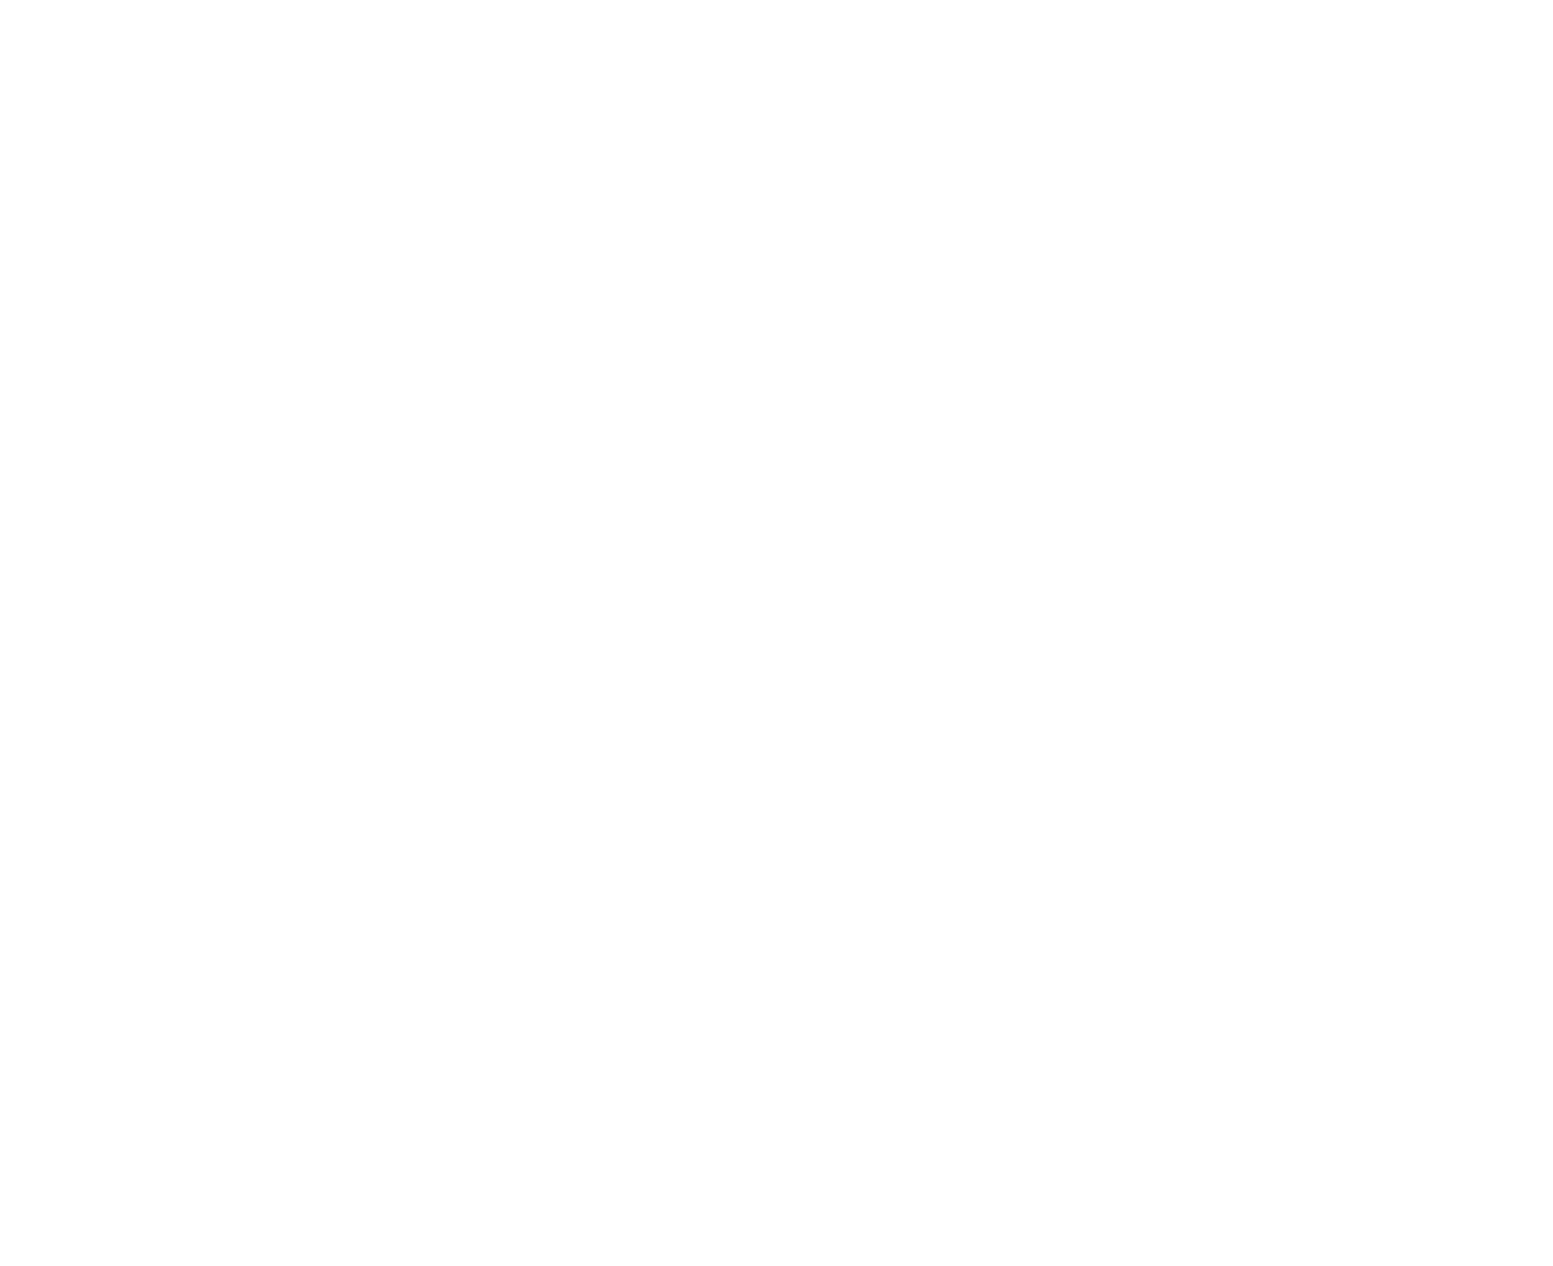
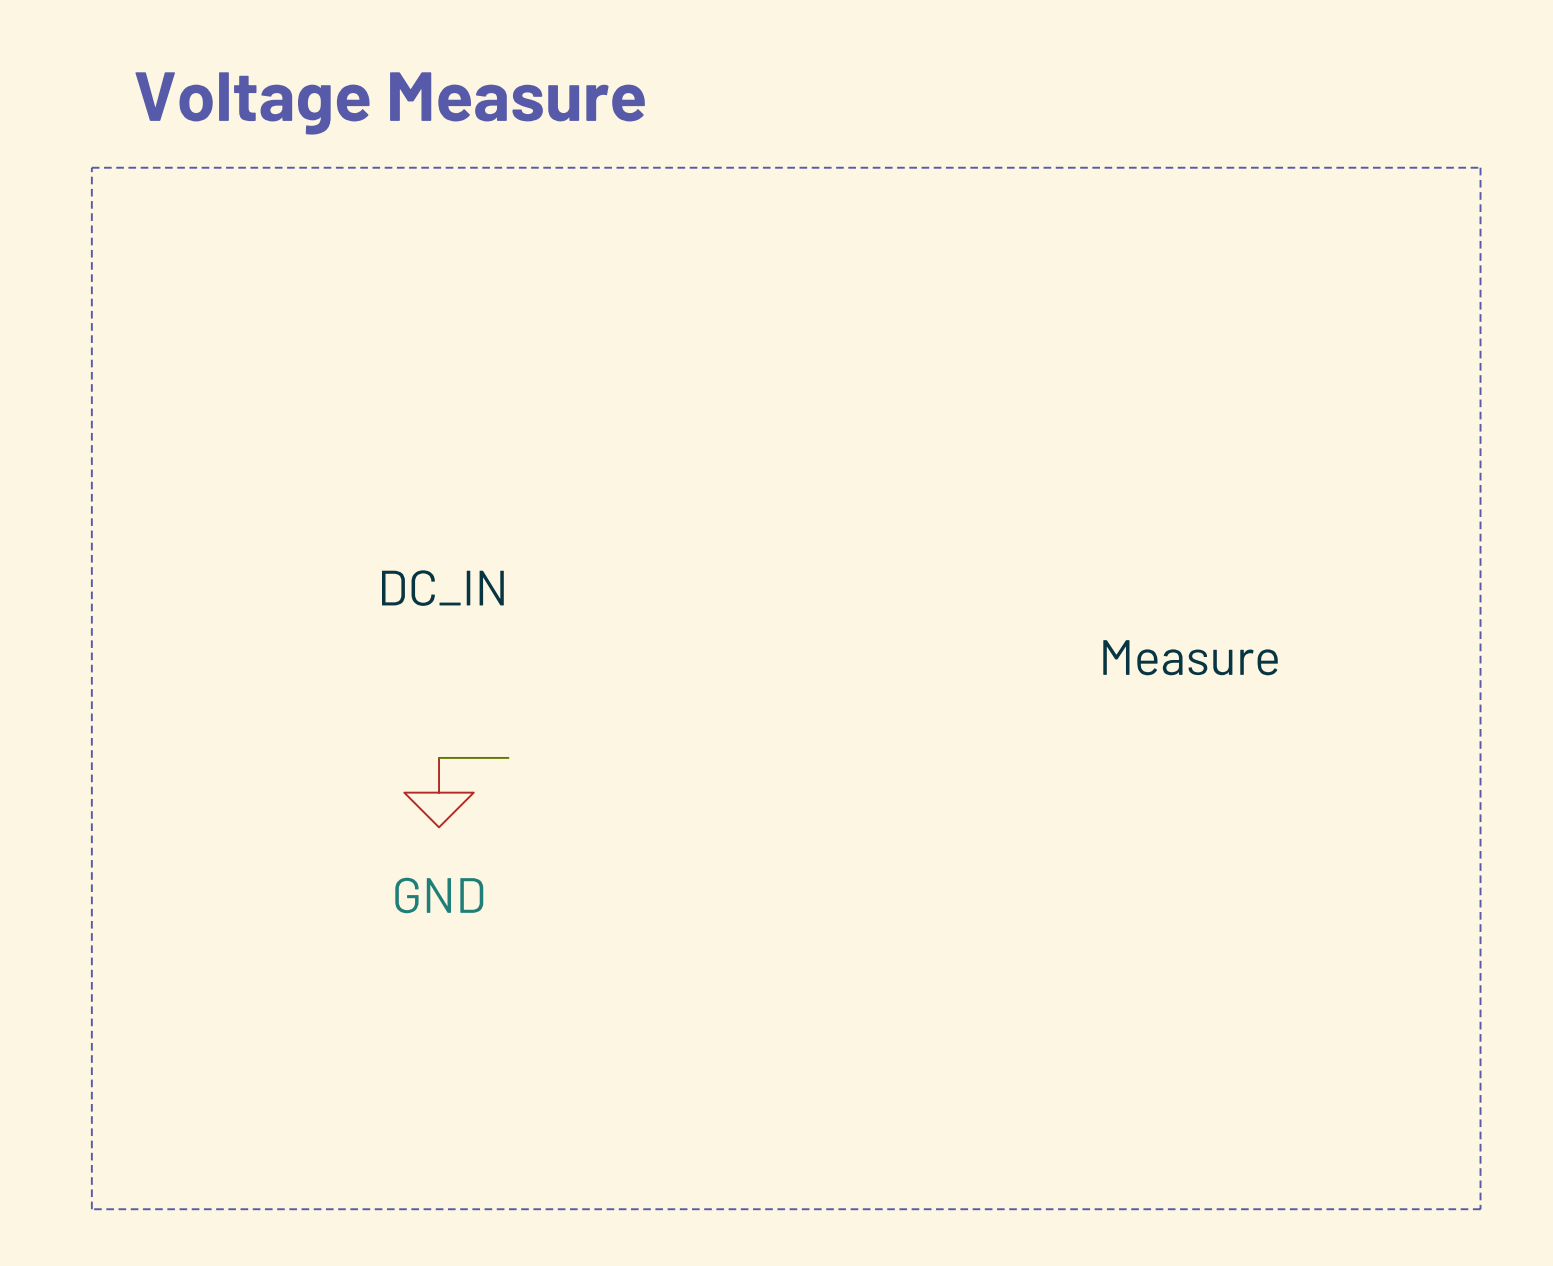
text: none -> Voltage Measure (390, 103)
line: none -> (91, 167) (1480, 167) (1480, 1209) (91, 1209) (91, 167)
label: none -> DC_IN (442, 588)
label: none -> Measure (1190, 657)
wire: none -> (439, 757) (508, 757)
power symbol: none -> GND (439, 792)

